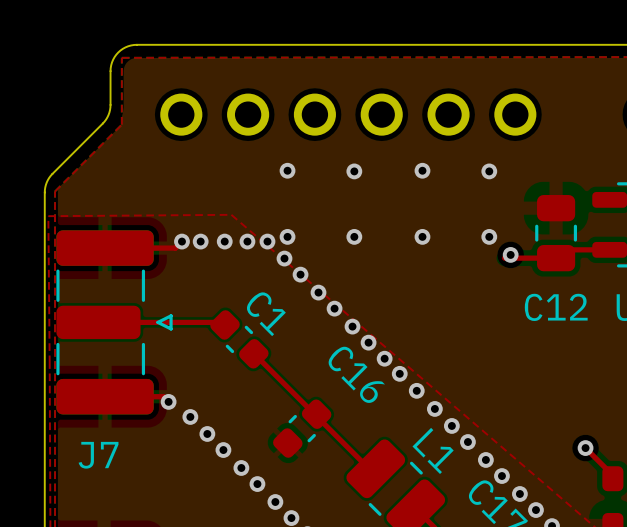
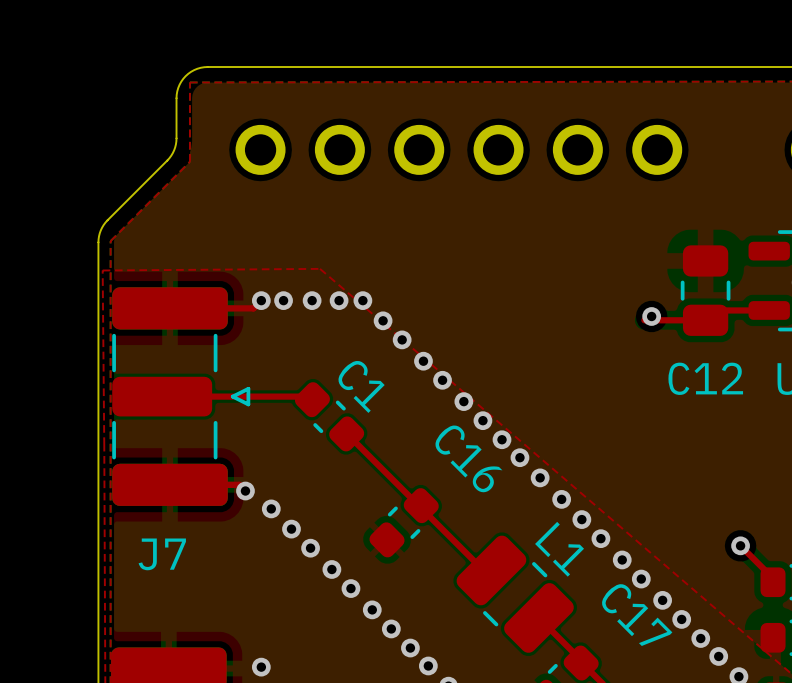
via: (287, 170) -> none
via: (422, 170) -> none
via: (354, 171) -> none
via: (489, 171) -> none
via: (287, 236) -> none
via: (354, 236) -> none
via: (422, 236) -> none
via: (489, 236) -> none

